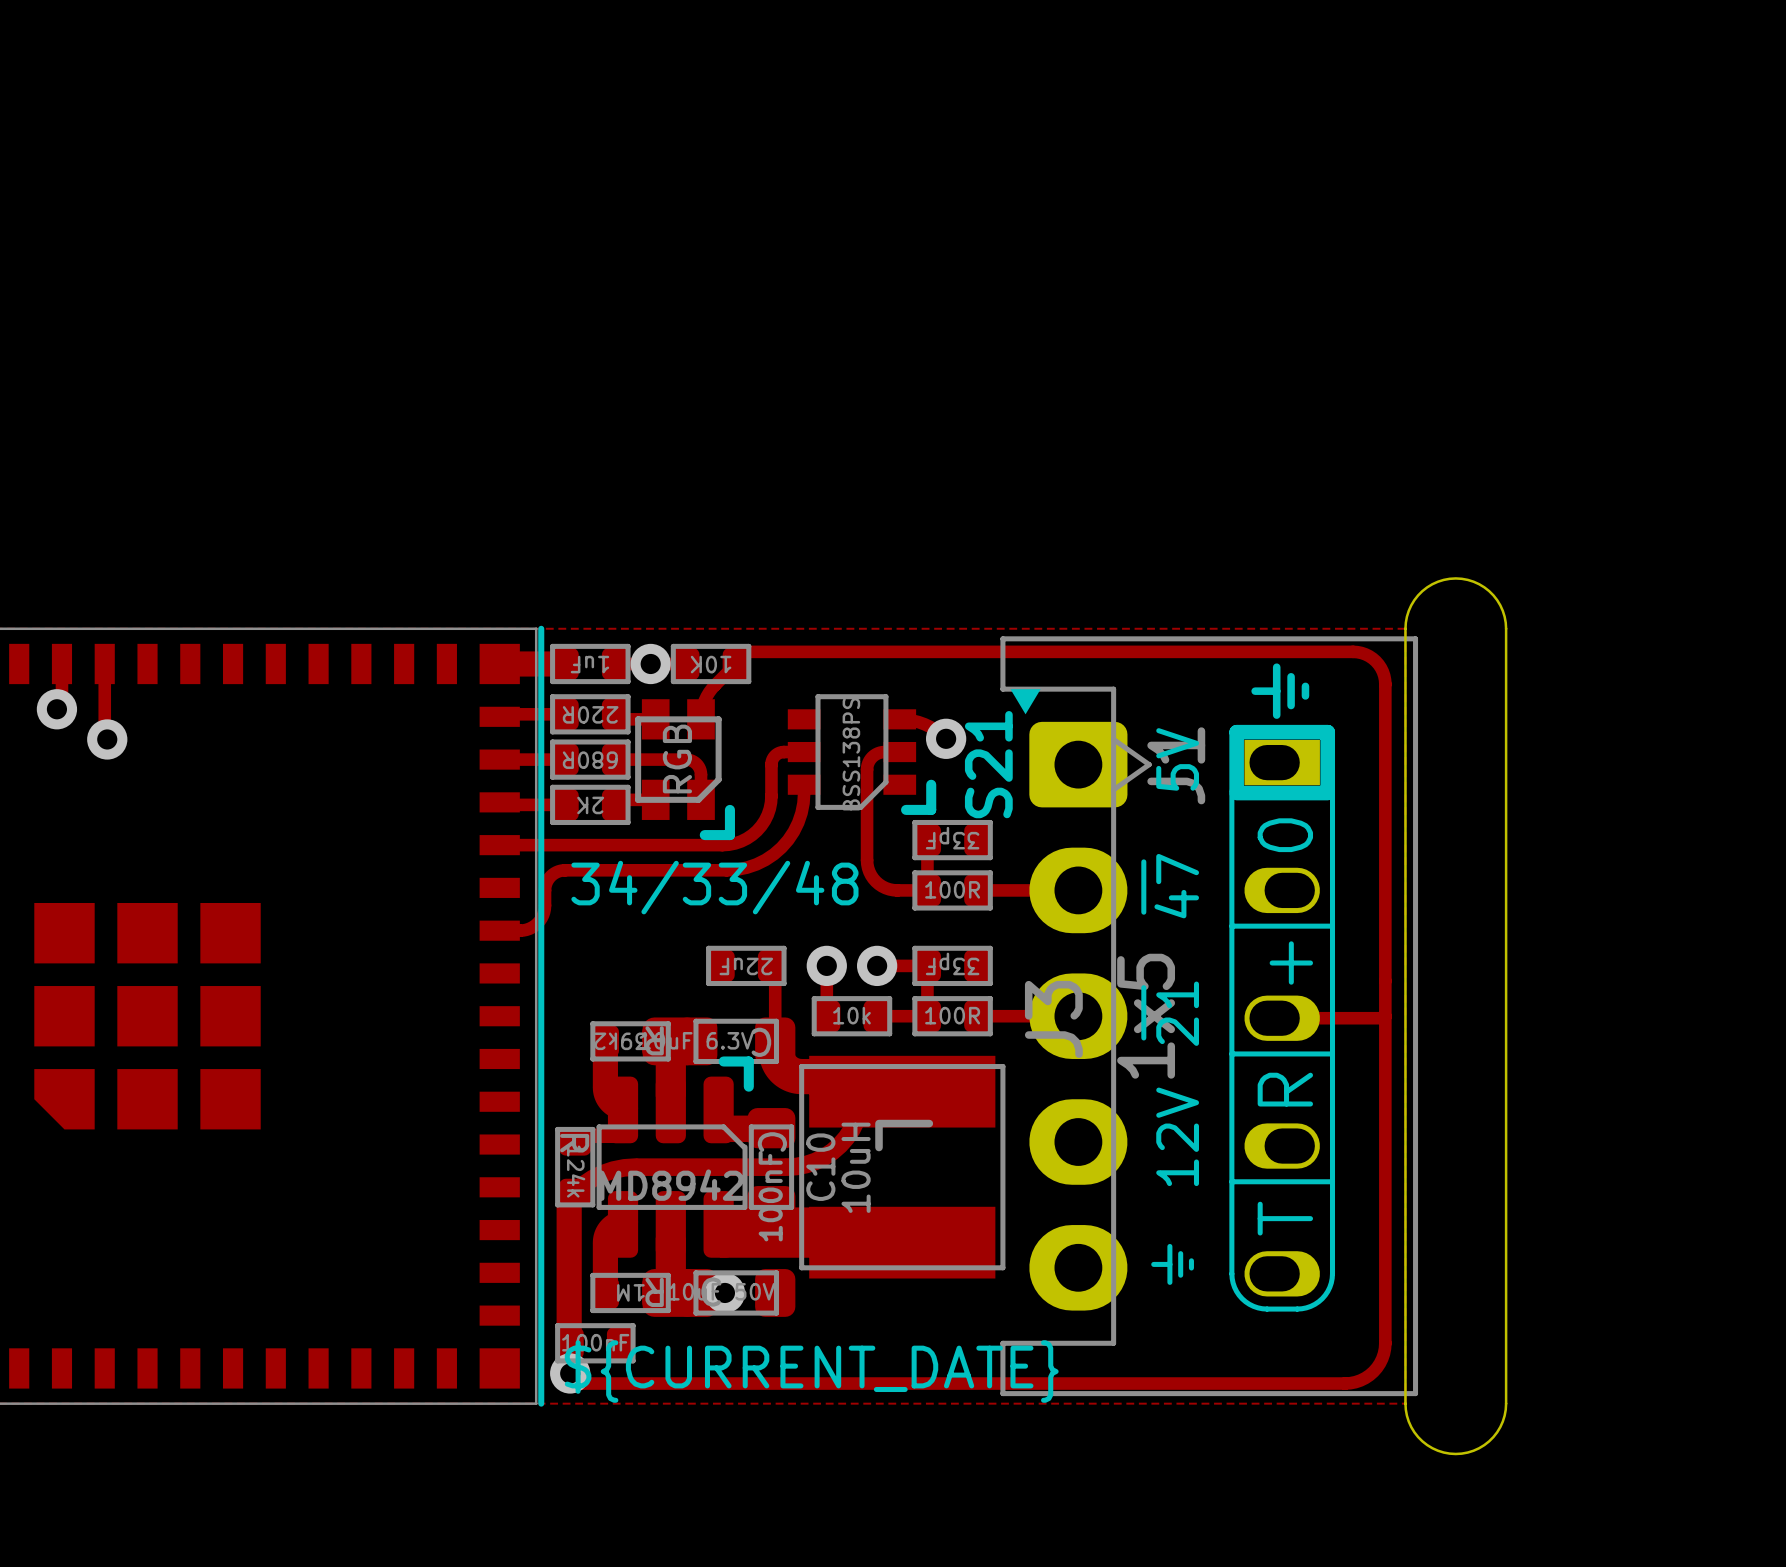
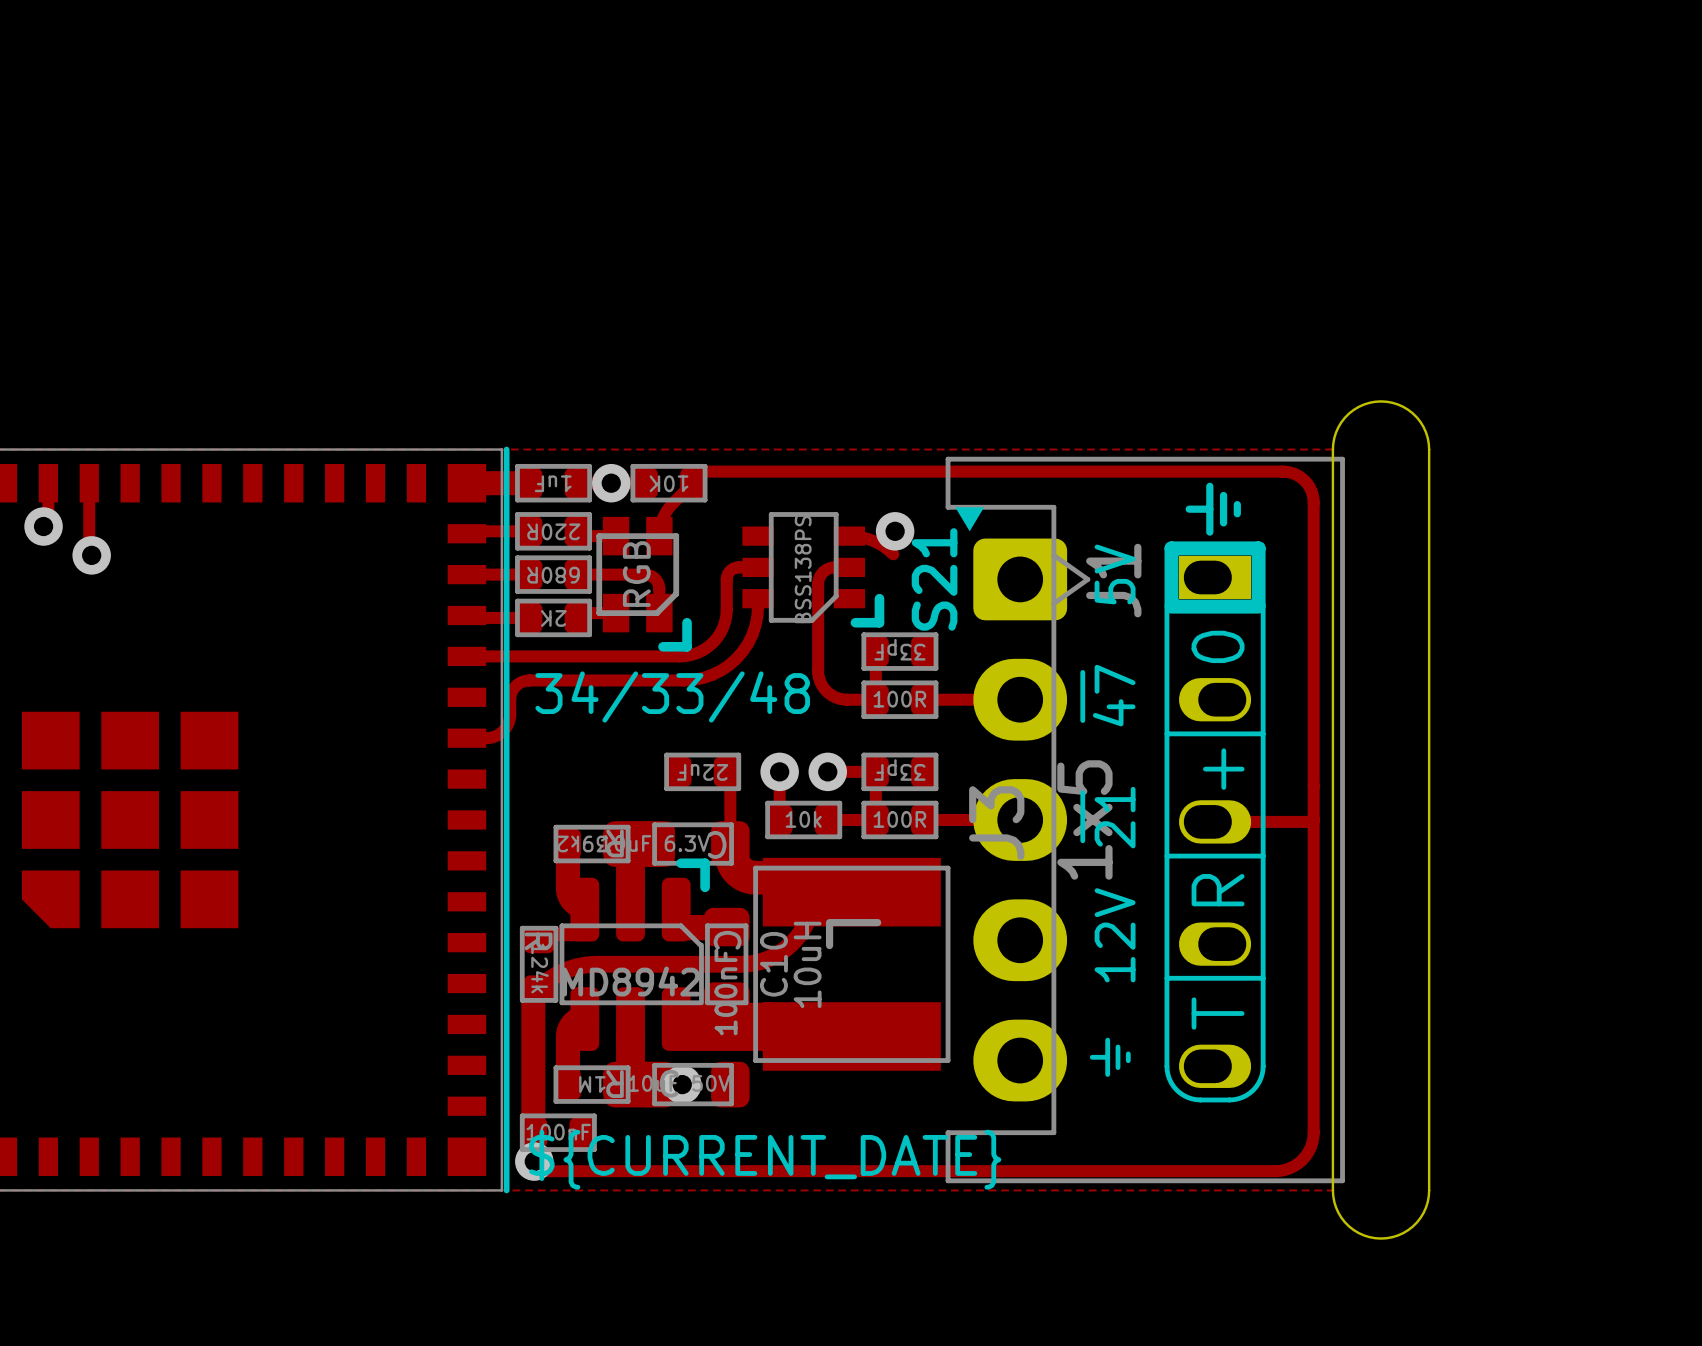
via position: (946, 738) -> (895, 531)

